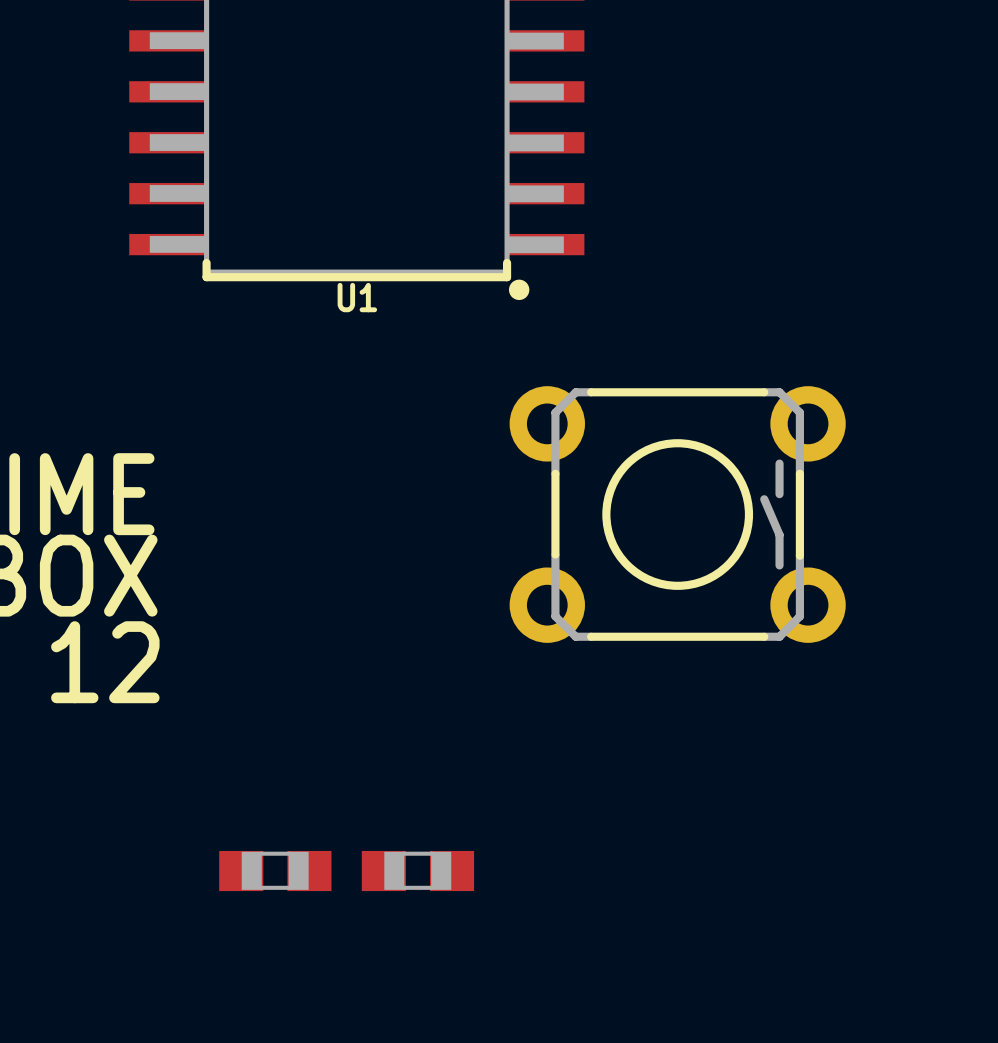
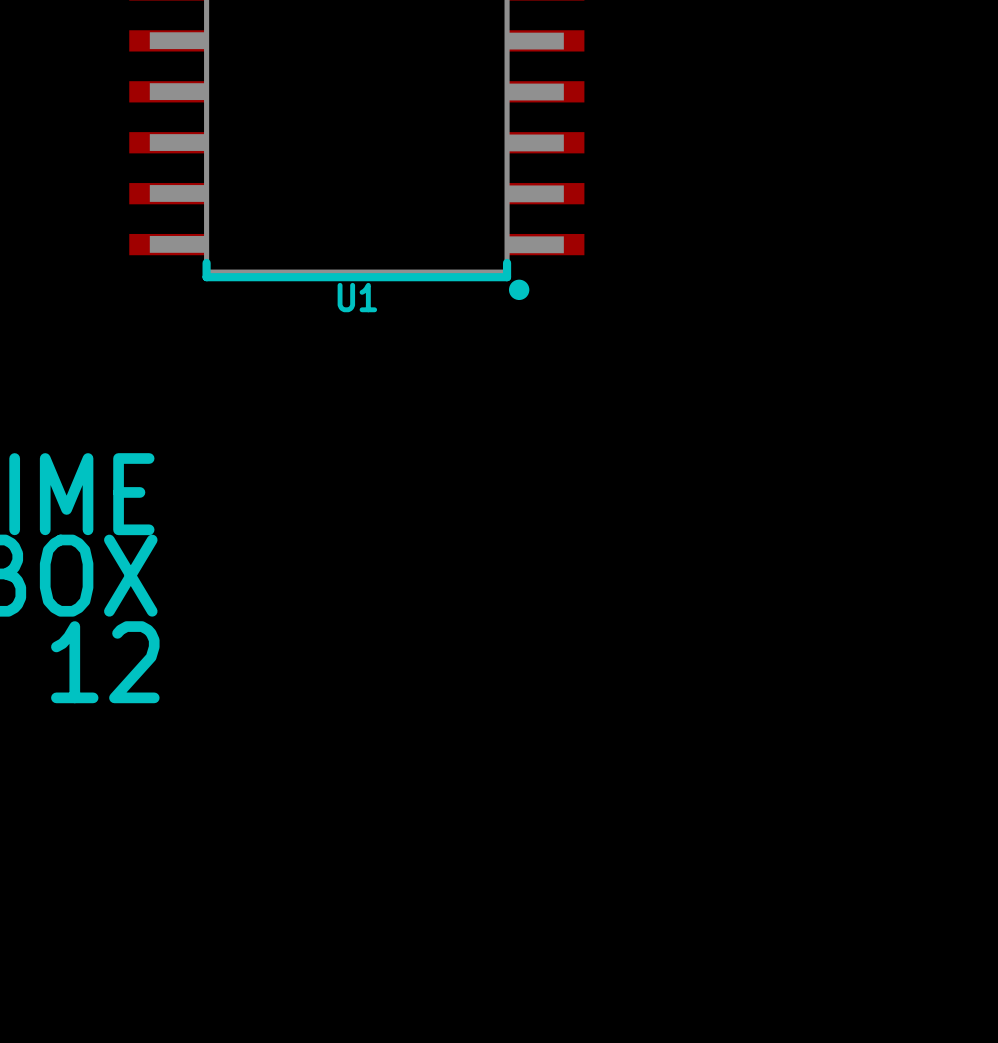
part: (677, 514) -> none
part: (275, 871) -> none
part: (417, 871) -> none

